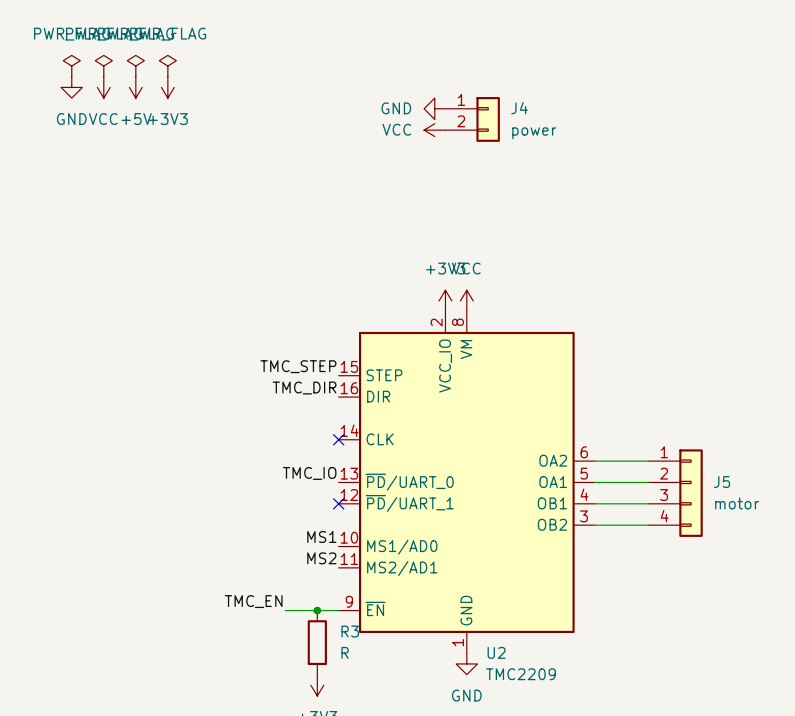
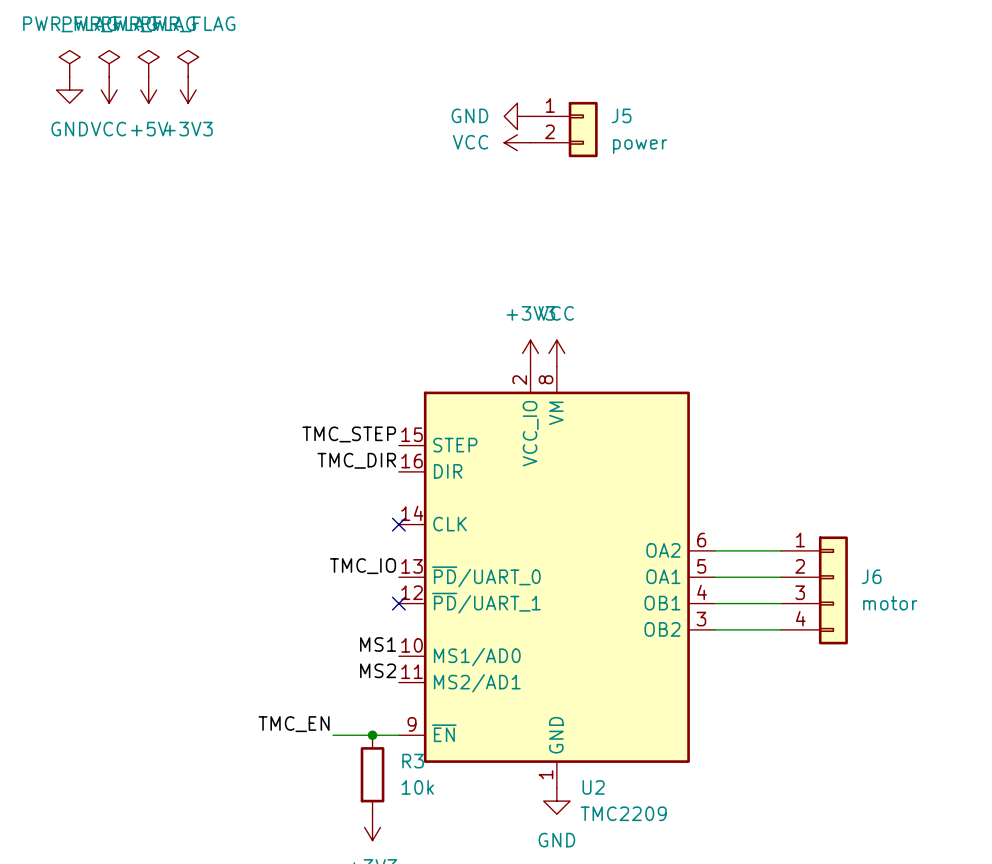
J4 name: J4 (519, 108) -> J5 (621, 115)
J5 name: J5 (722, 482) -> J6 (871, 576)
R3 value: R (345, 652) -> 10k (417, 787)

